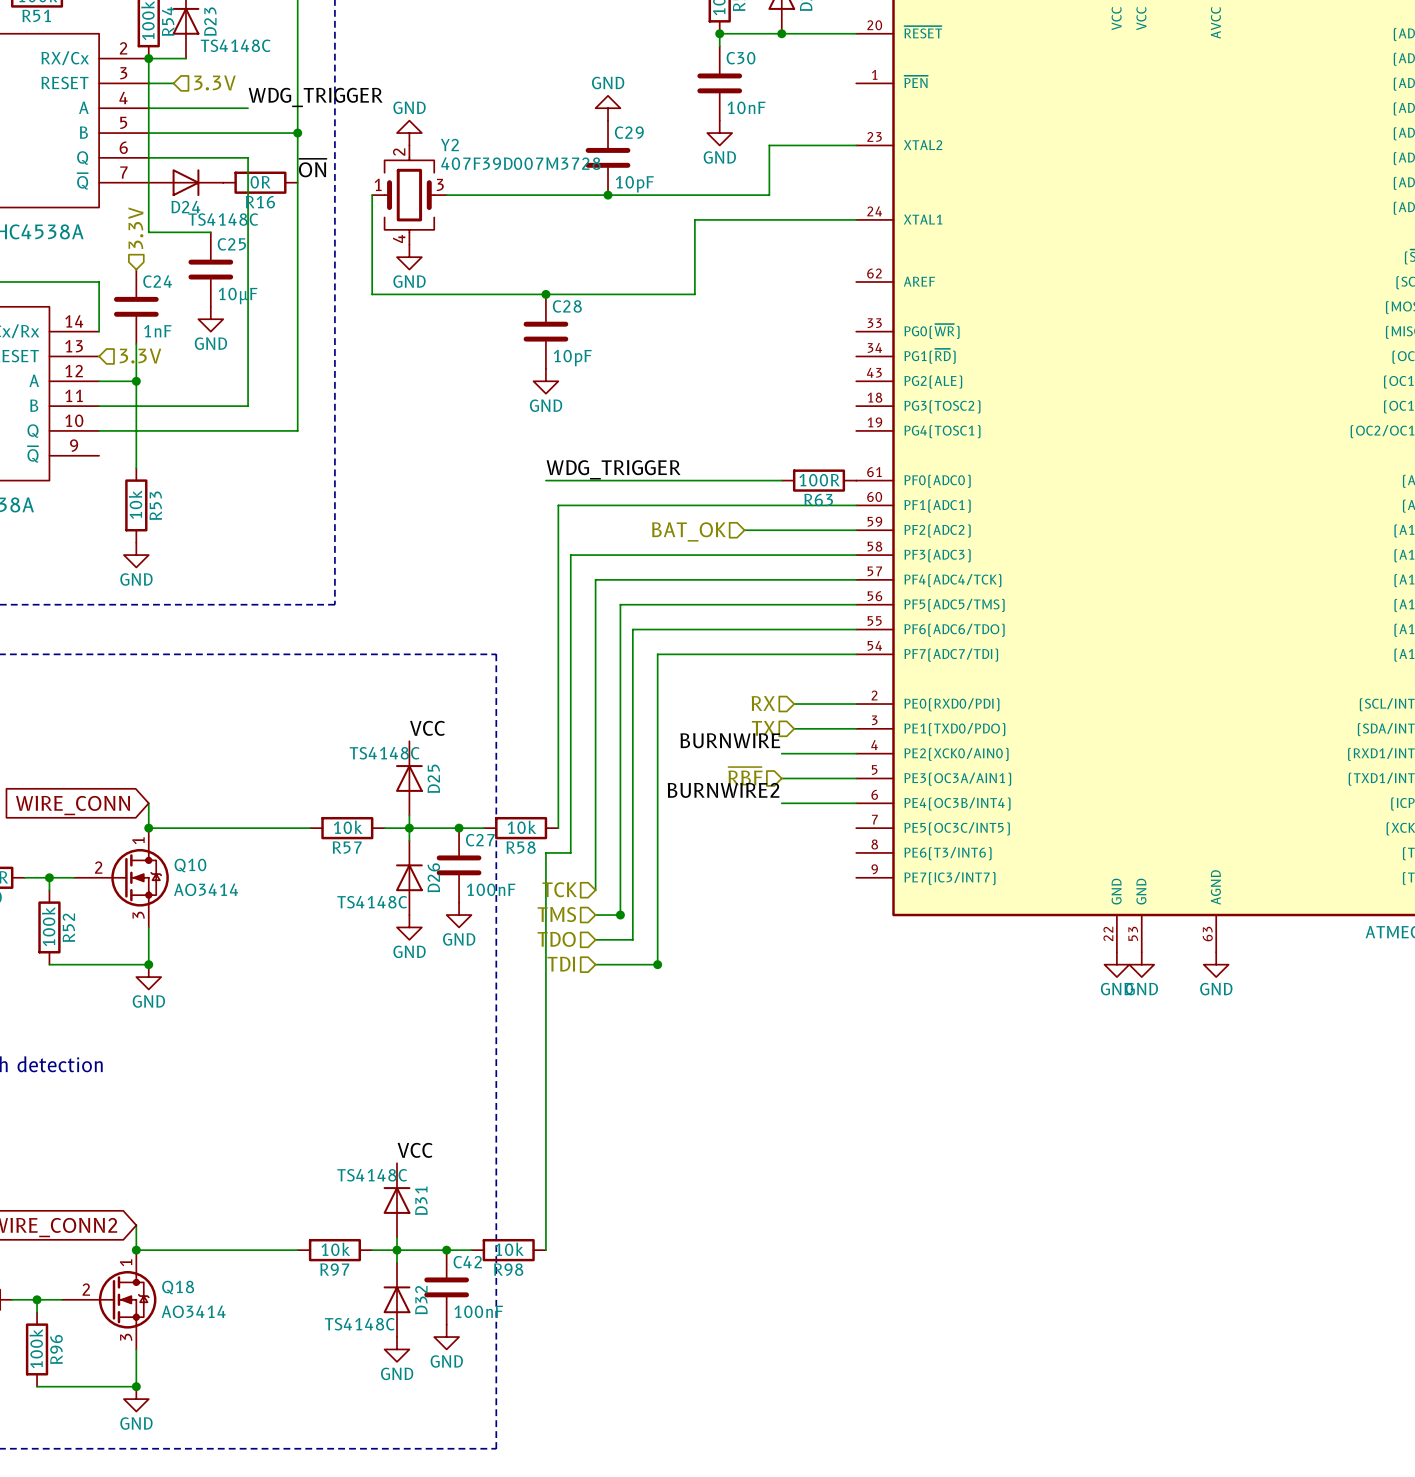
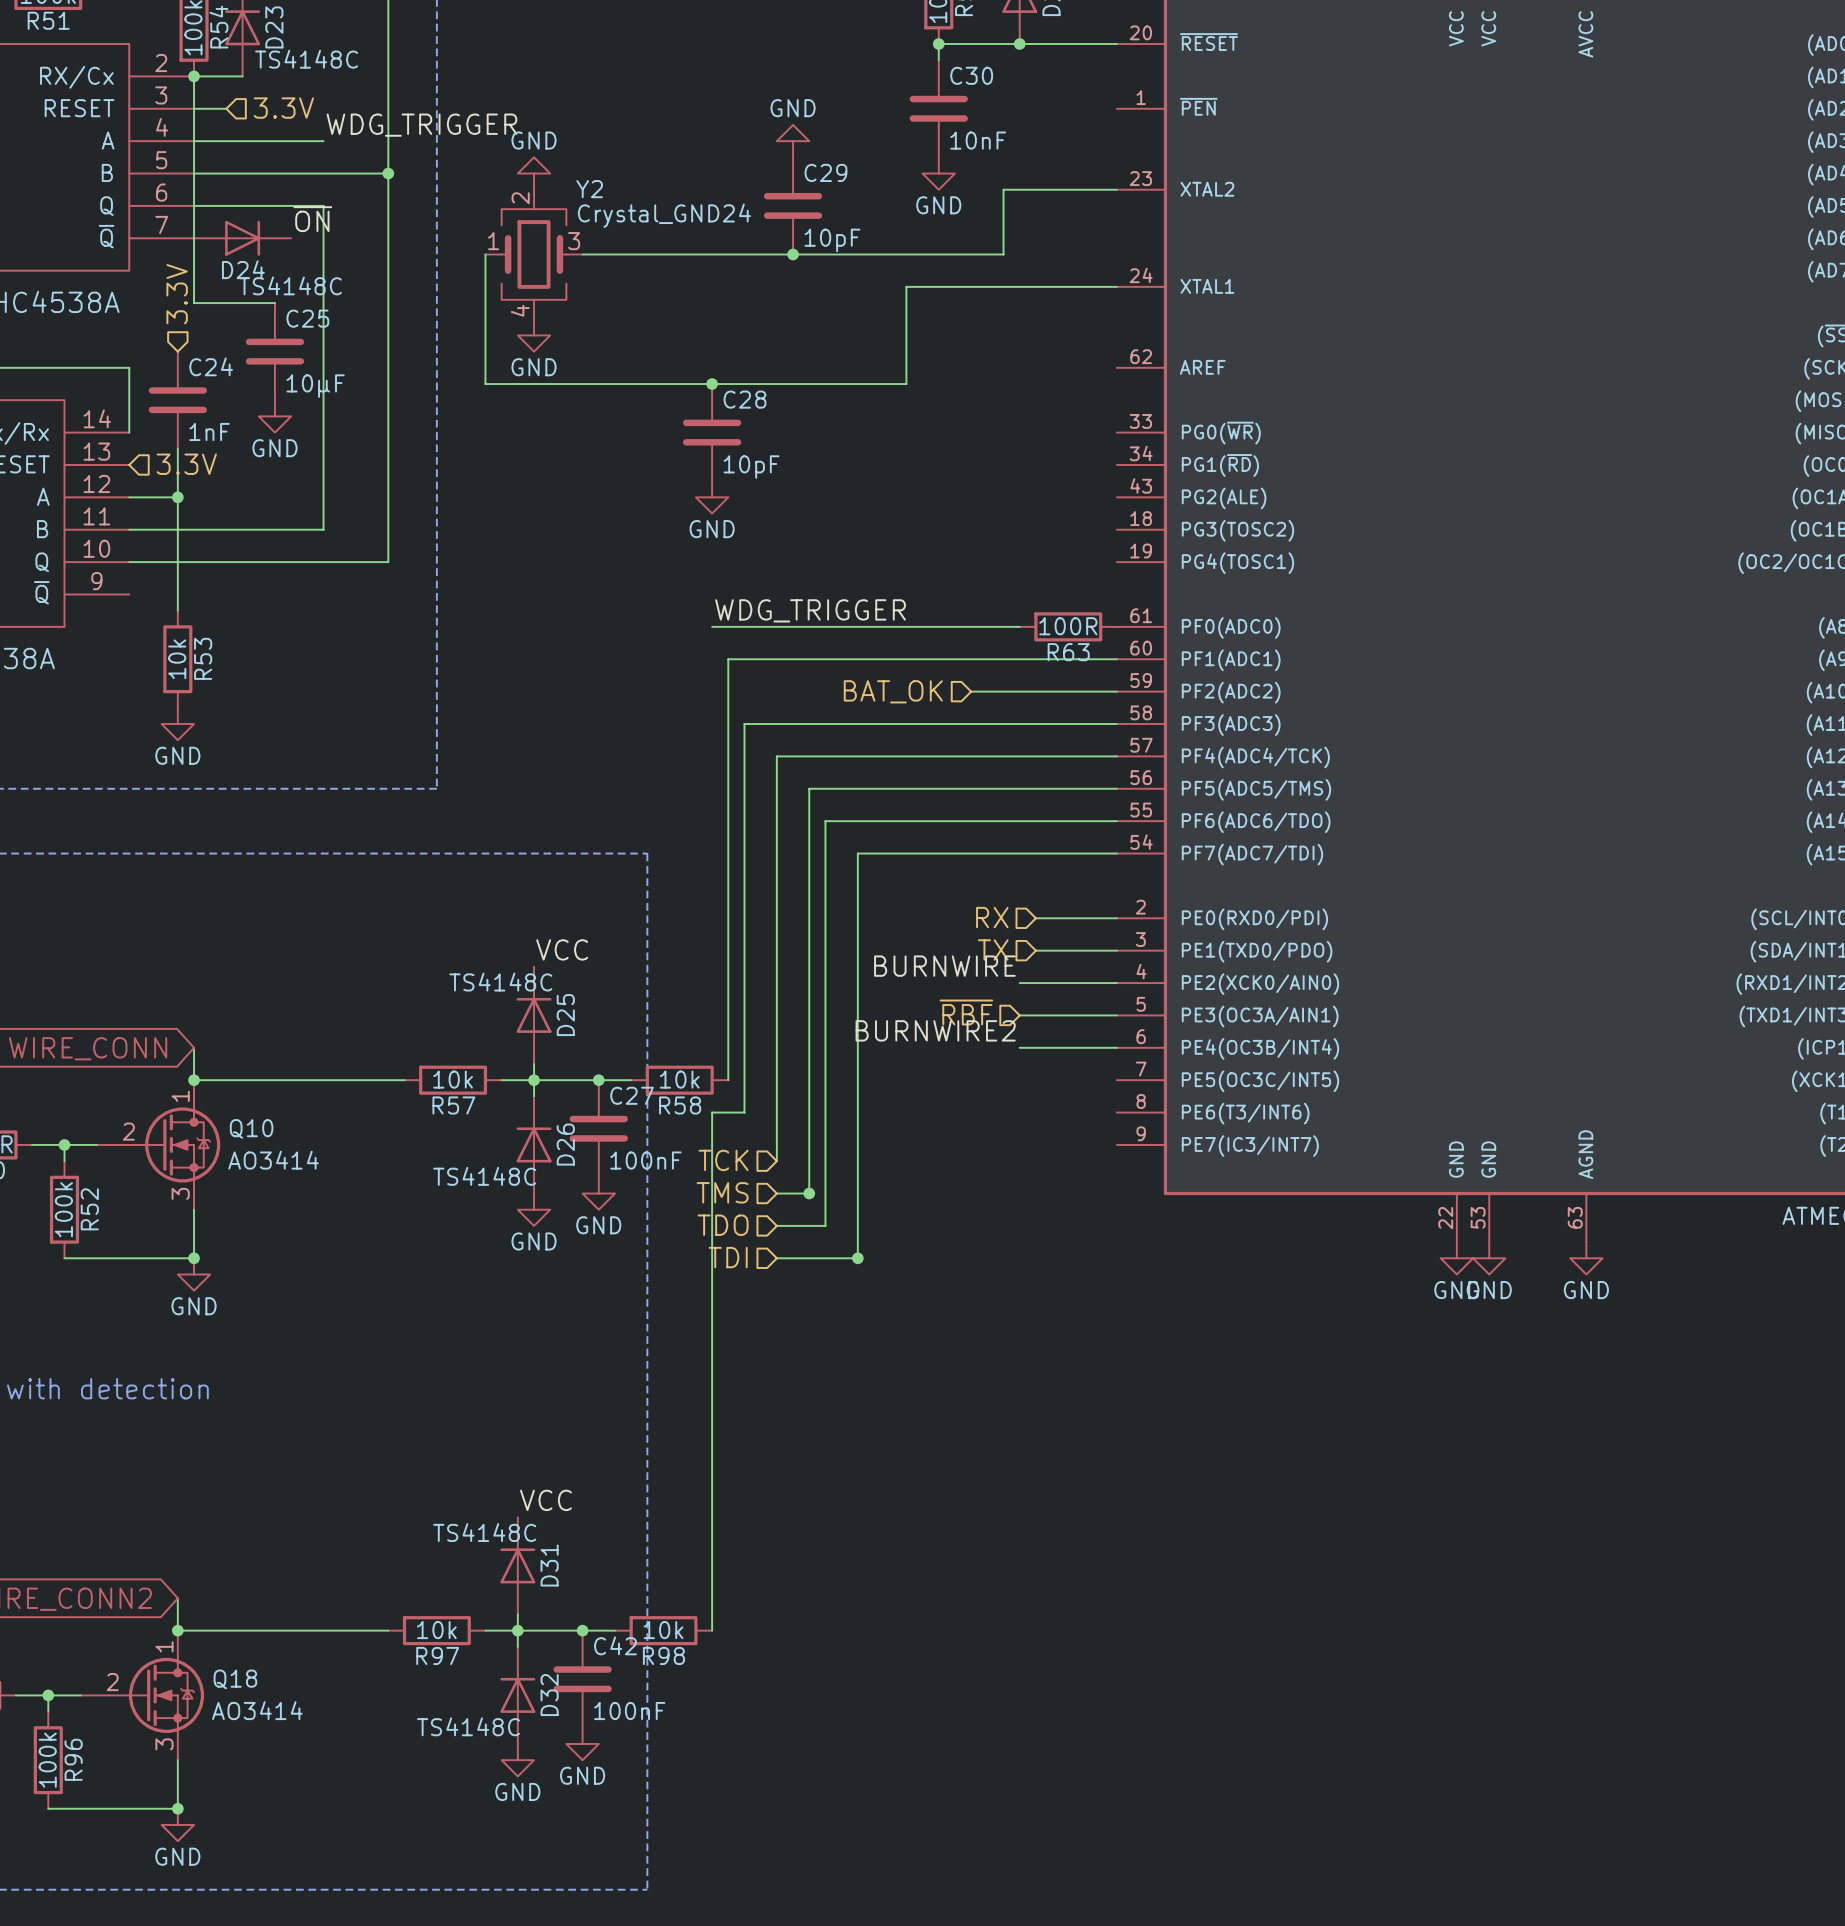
Y2 value: 407F39D007M3728 (521, 163) -> Crystal_GND24 (664, 215)
label position: ~{ON} (312, 168) -> ~{ON} (312, 219)
R16: 0R (260, 182) -> none

